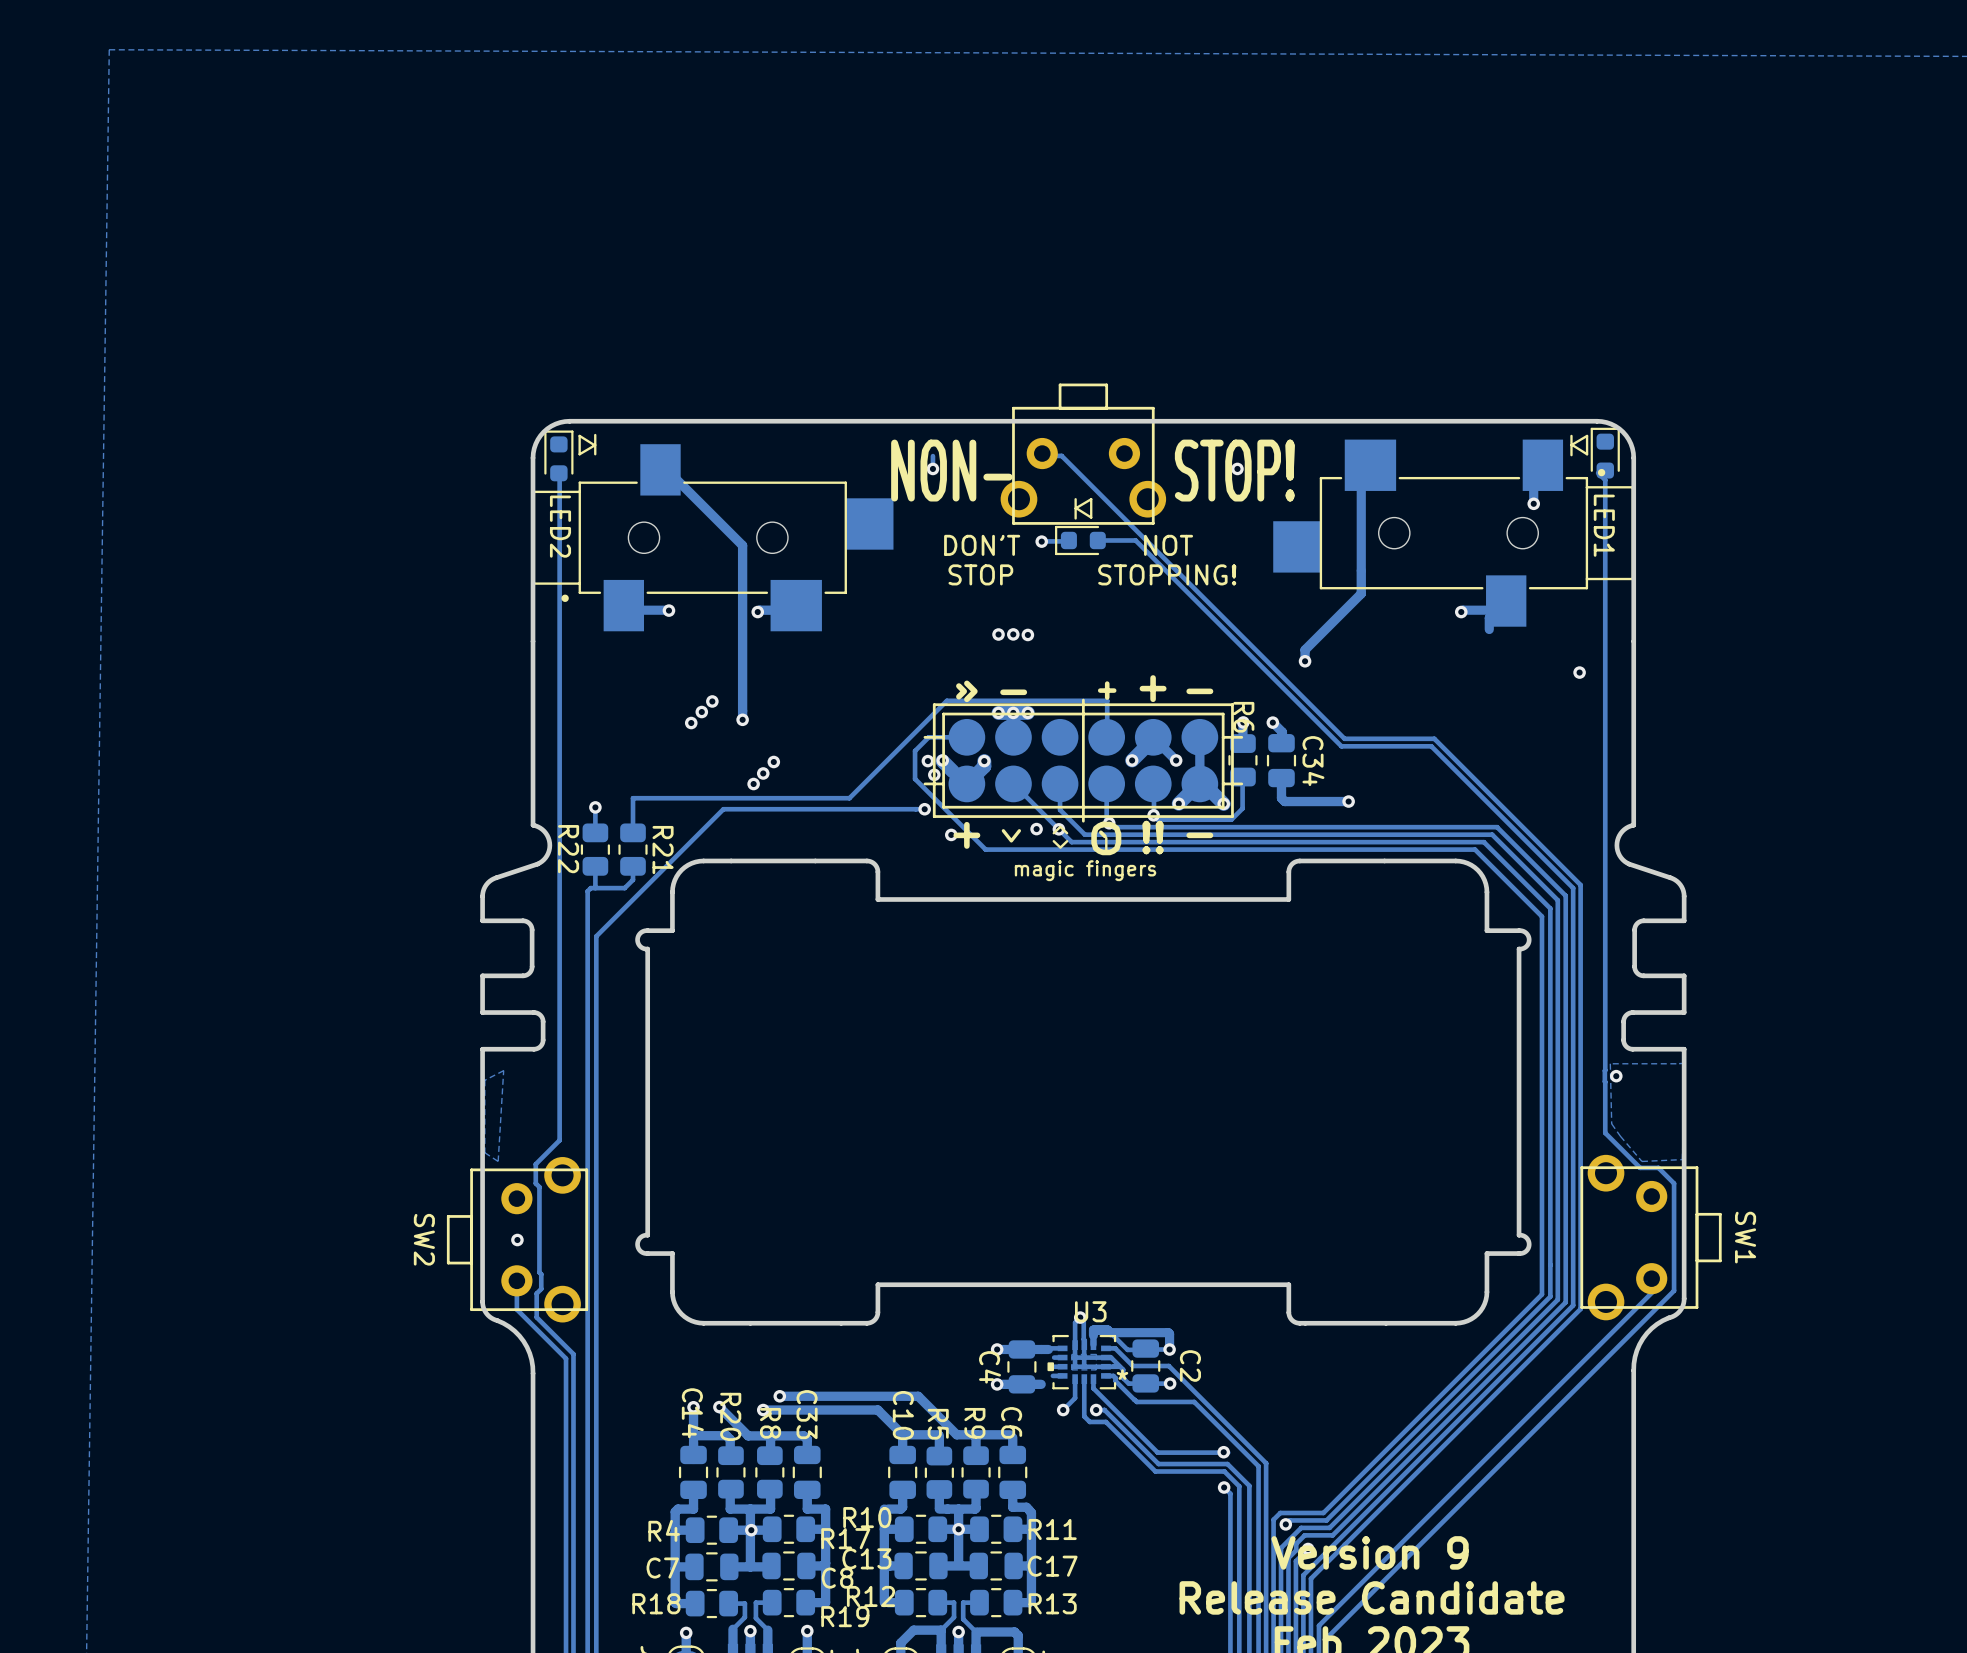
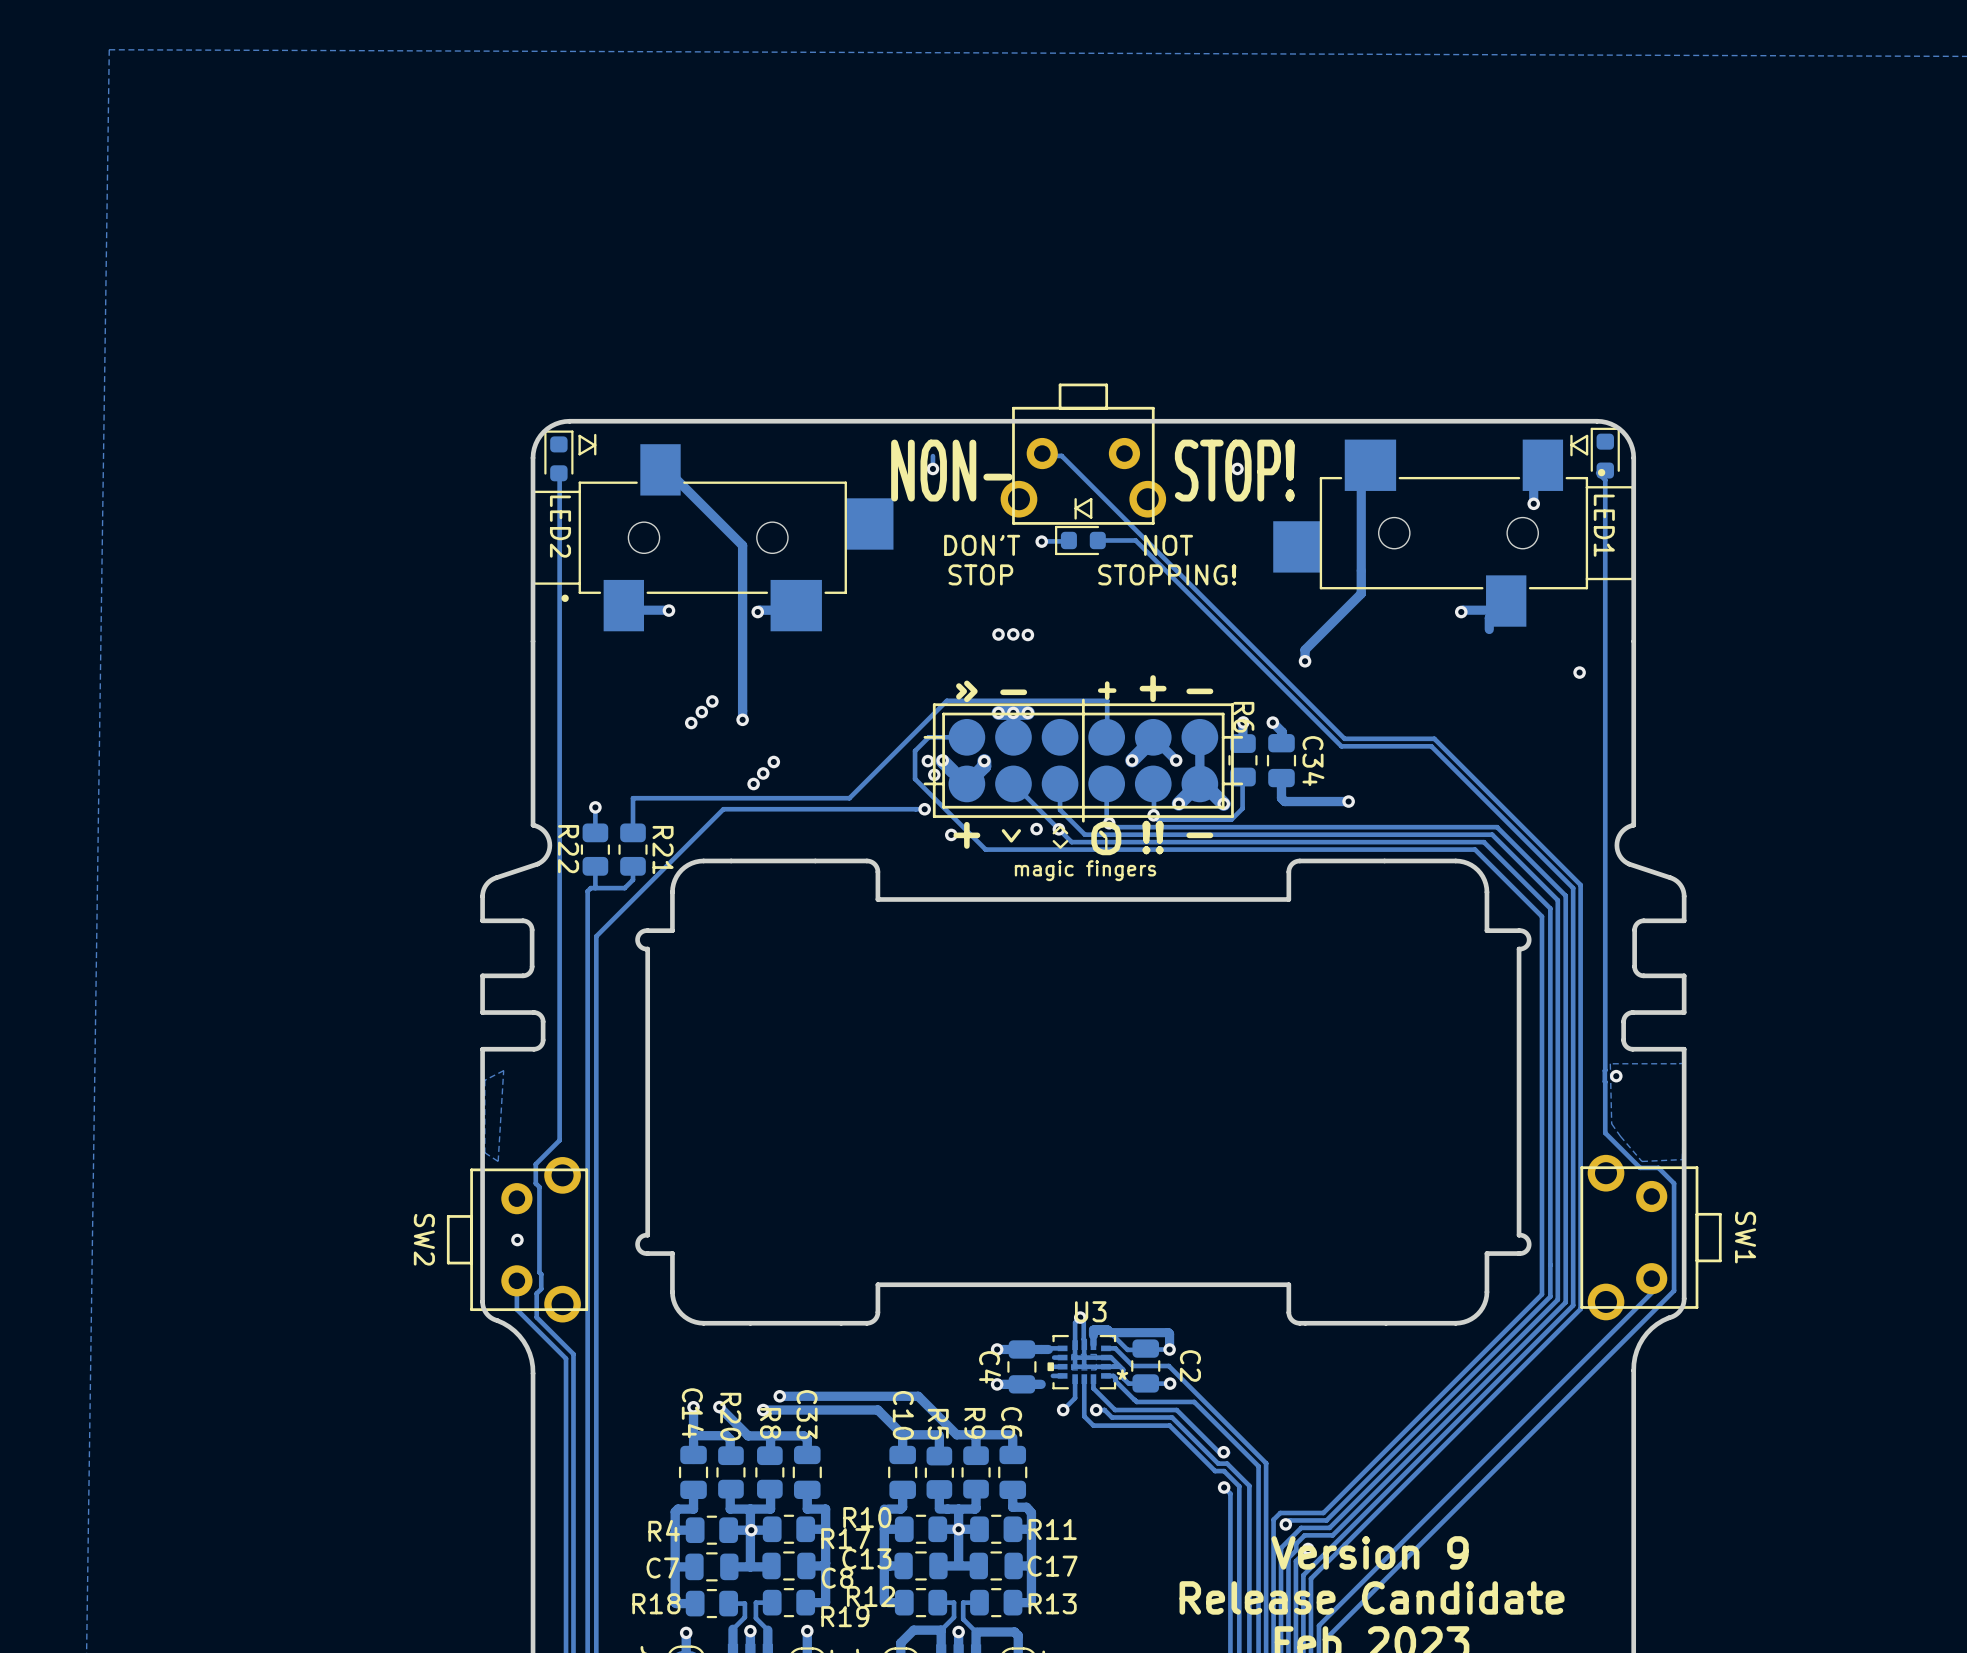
track: (1115, 1410) (1157, 1452) (1219, 1452) -> (1115, 1410) (1176, 1410) (1219, 1452)
track: (1112, 1417) (1158, 1464) (1227, 1464) -> (1112, 1417) (1172, 1417) (1218, 1463) (1227, 1464)
track: (1089, 1421) (1105, 1421) (1155, 1471) (1224, 1471) -> (1089, 1421) (1093, 1425) (1169, 1425) (1215, 1471) (1224, 1471)

